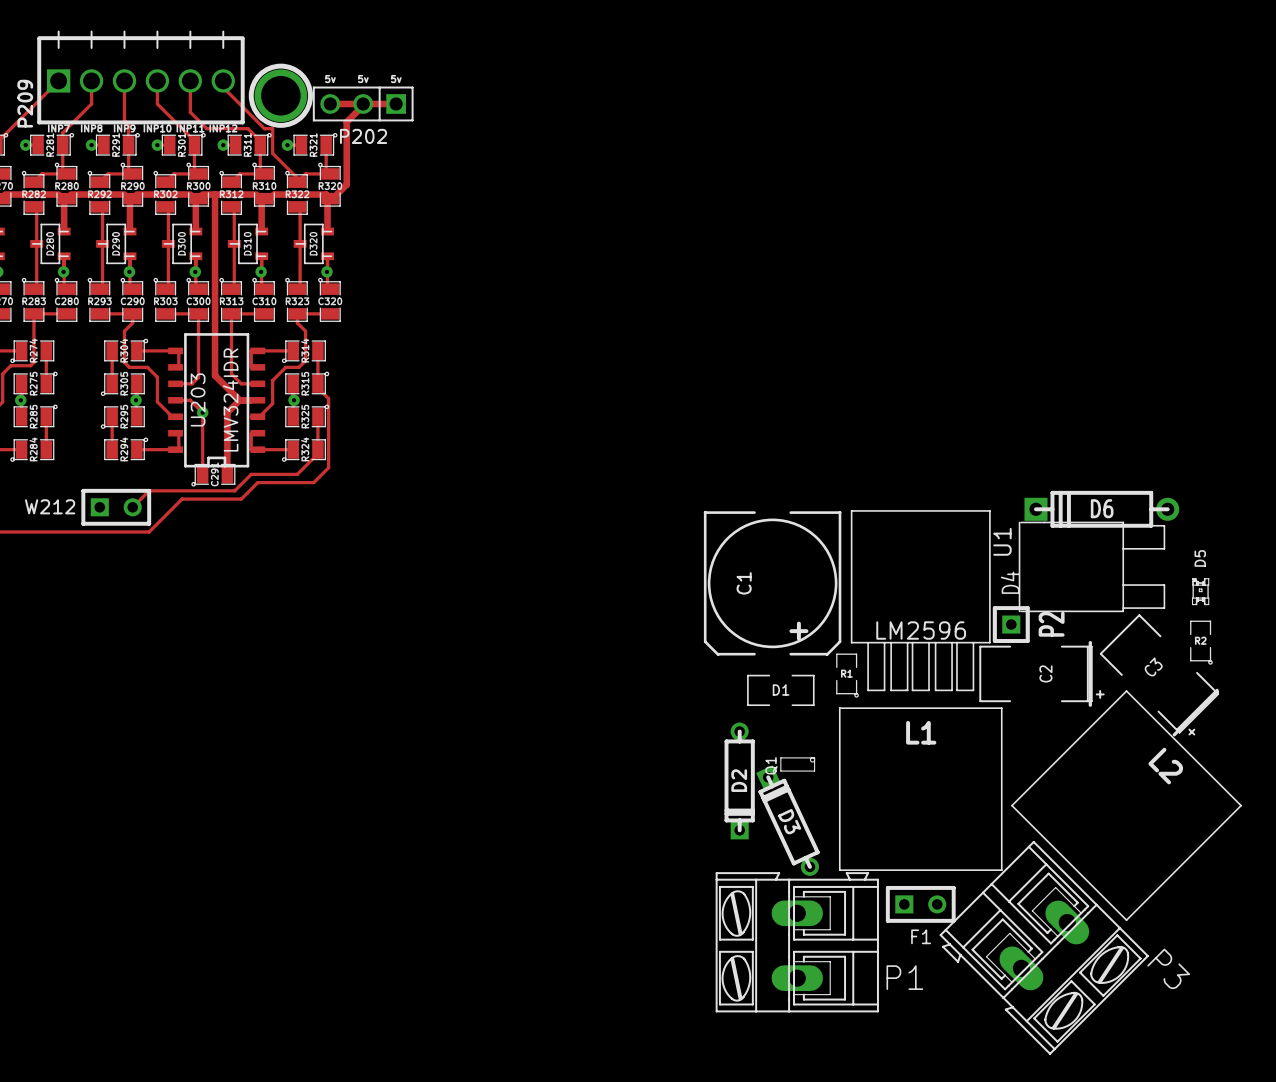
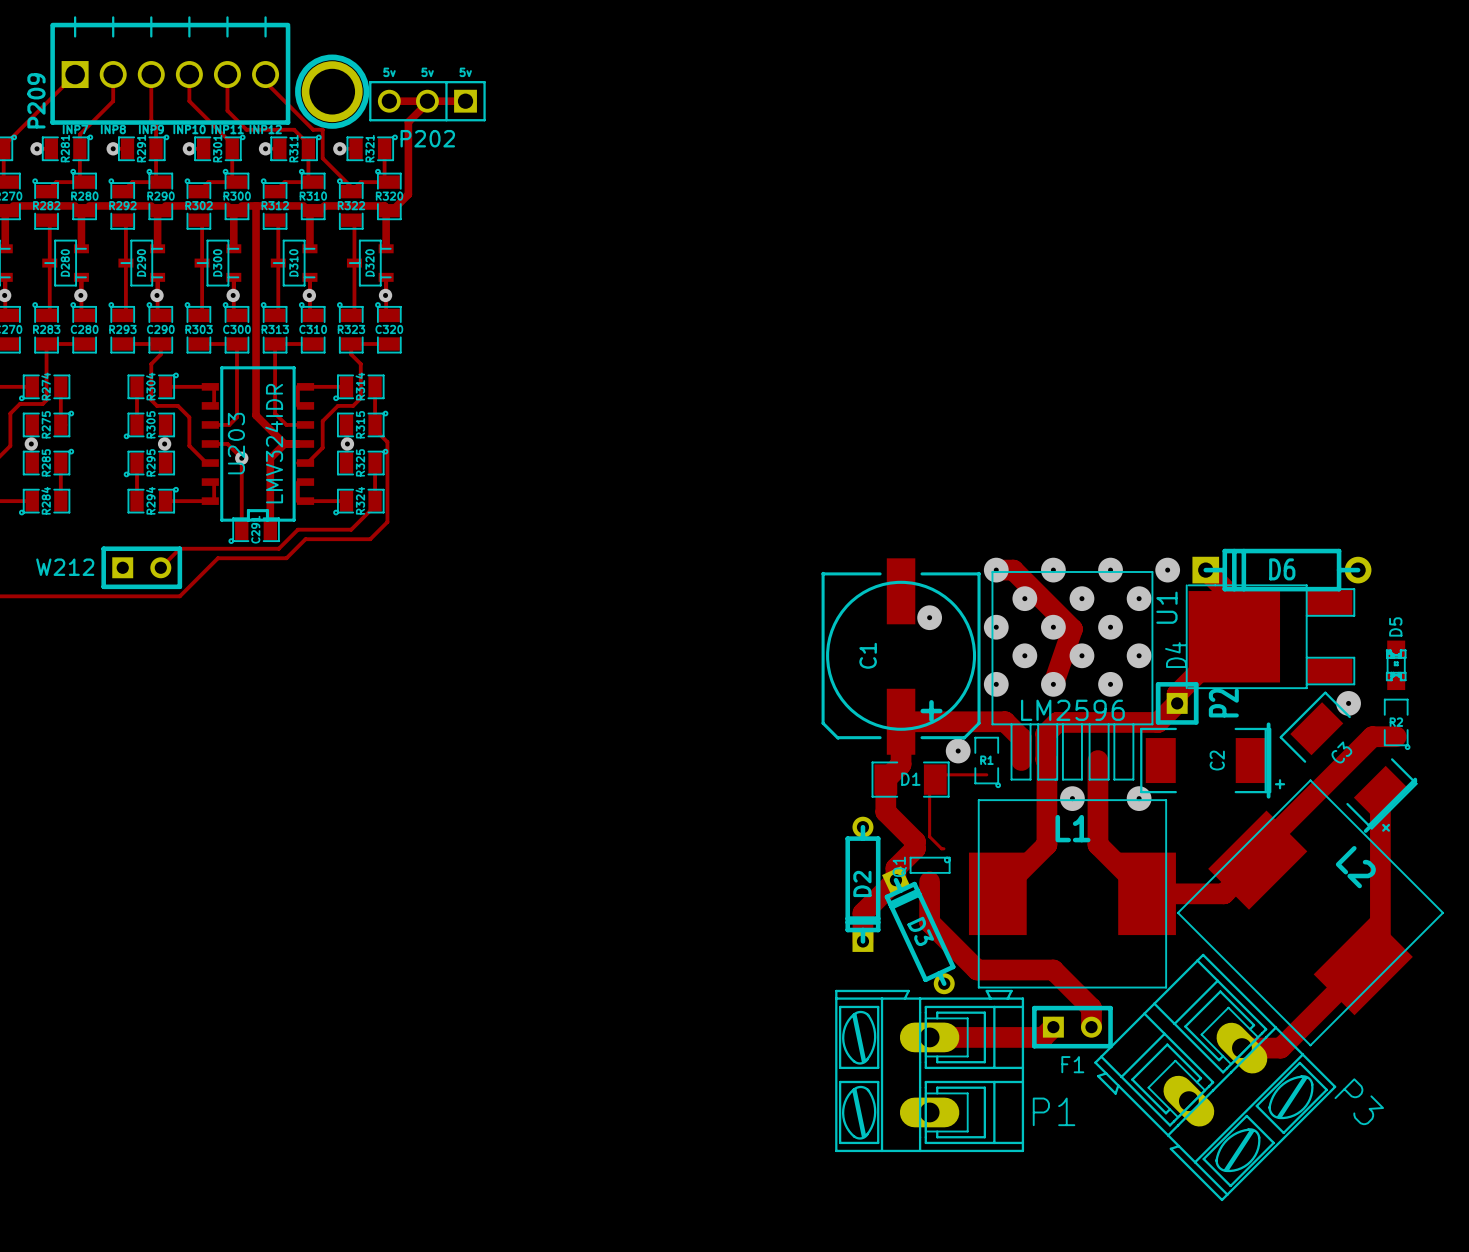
track: none -> (996, 570) (1013, 570) (1072, 629) (1053, 684)
via: none -> (996, 570)
via: none -> (1053, 570)
via: none -> (1110, 570)
via: none -> (1167, 570)
track: none -> (1205, 570) (1234, 598) (1234, 636) (1177, 693) (1177, 703) (1158, 722) (1057, 722) (1045, 733) (1046, 844) (997, 893)
C1 footprint: [703, 510, 842, 656] -> [821, 558, 981, 755]
D4 footprint: [1018, 521, 1166, 613] -> [1185, 584, 1356, 690]
via: none -> (1024, 598)
via: none -> (1081, 598)
via: none -> (1139, 598)
via: none -> (929, 617)
via: none -> (996, 627)
via: none -> (1053, 627)
via: none -> (1110, 627)
D5 footprint: [1192, 578, 1210, 606] -> [1386, 640, 1407, 691]
via: none -> (1024, 655)
via: none -> (1081, 655)
via: none -> (1139, 655)
via: none -> (996, 684)
via: none -> (1053, 684)
via: none -> (1110, 684)
C3 footprint: [1099, 614, 1220, 734] -> [1279, 691, 1418, 830]
via: none -> (1348, 703)
C2 footprint: [979, 645, 1093, 703] -> [1140, 727, 1272, 794]
track: none -> (1396, 736) (1372, 736) (1257, 851) (1257, 860) (1224, 893) (1147, 893) (1097, 844) (1097, 760)
via: none -> (958, 751)
track: none -> (1021, 760) (1021, 738) (1005, 721) (901, 721) (901, 764) (885, 779) (885, 811) (915, 841) (915, 848) (895, 868) (895, 880) (862, 913) (862, 941)
D1 footprint: [747, 674, 815, 707] -> [871, 761, 950, 798]
track: none -> (986, 774) (940, 774) (929, 785) (929, 836) (943, 848)
L2 footprint: [1011, 690, 1242, 921] -> [1177, 779, 1444, 1047]
track: none -> (1380, 792) (1380, 948) (1280, 1048) (1241, 1048)
via: none -> (1072, 798)
via: none -> (1139, 798)
L1 footprint: [838, 707, 1003, 871] -> [968, 799, 1176, 989]
track: none -> (929, 881) (929, 922) (977, 970) (1053, 970) (1091, 1008) (1091, 1027)
track: none -> (1053, 1027) (1043, 1037) (929, 1037)

